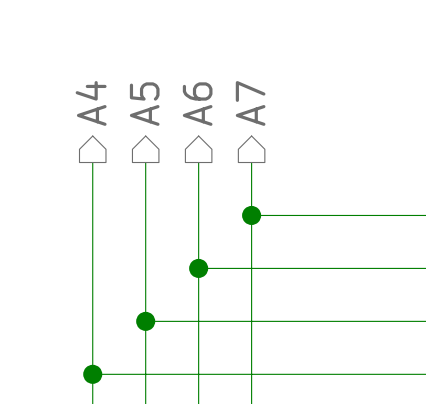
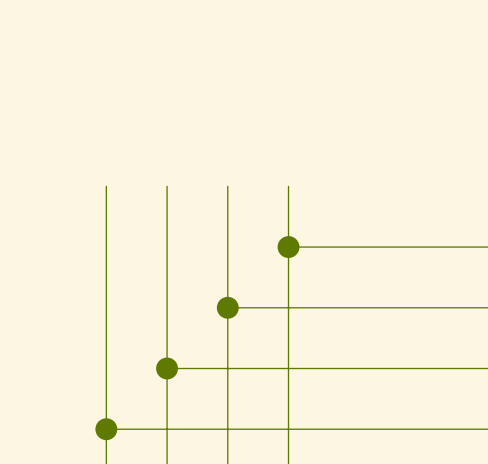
hierarchical label: A4 (91, 103) -> none
hierarchical label: A7 (250, 103) -> none
hierarchical label: A5 (144, 104) -> none
hierarchical label: A6 (197, 104) -> none

